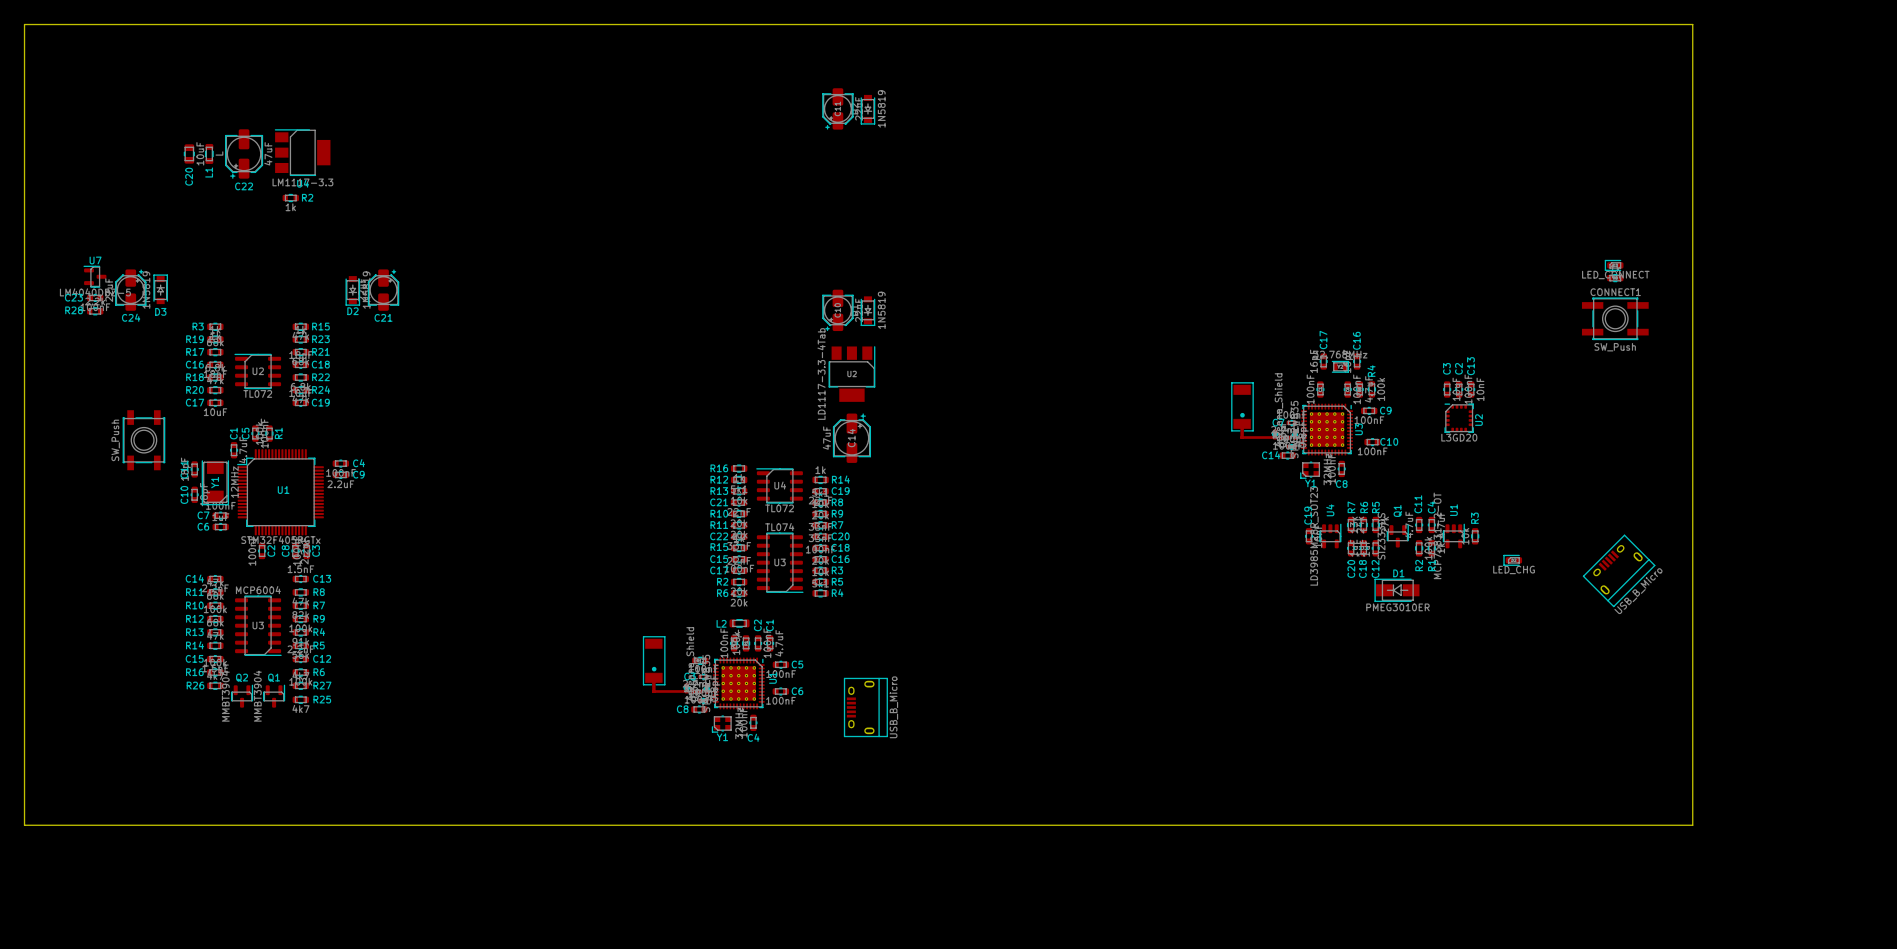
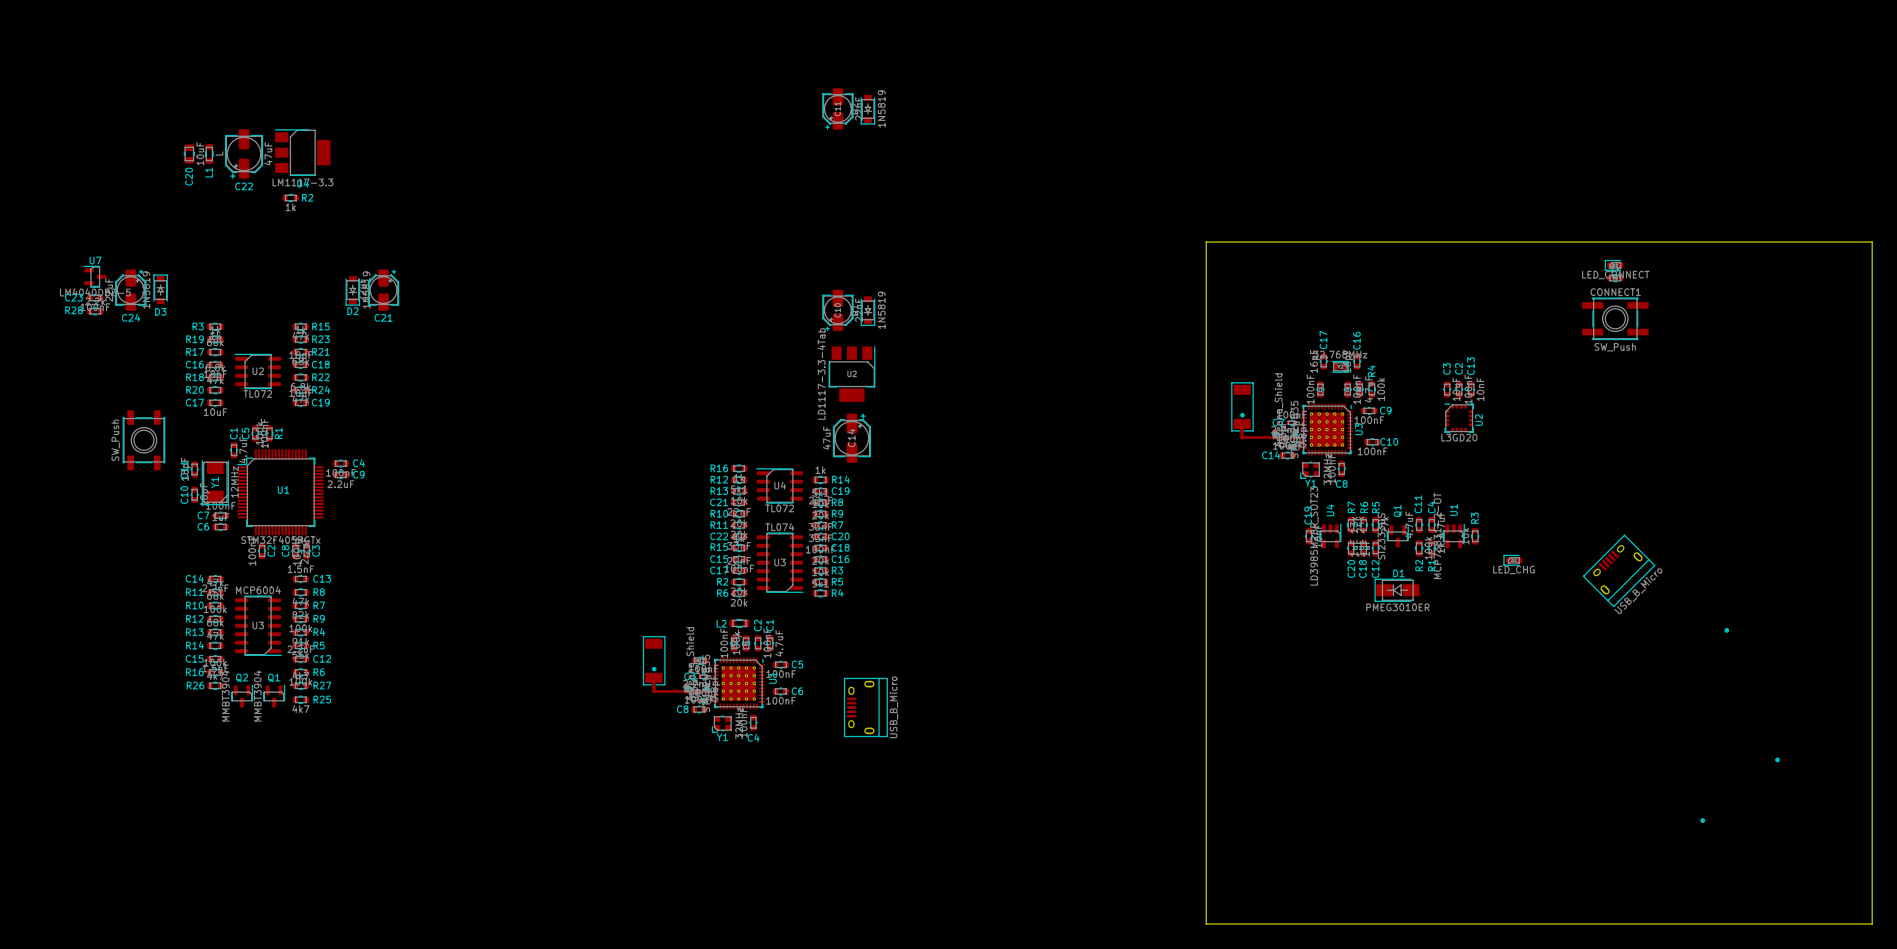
board edge: (24, 24) (1692, 24) (1692, 825) (24, 825) (24, 24) -> none
board edge: none -> (1206, 242) (1872, 242) (1872, 924) (1206, 924) (1206, 242)
drawing: none -> [1724, 628, 1730, 633]
drawing: none -> [1775, 757, 1780, 763]
drawing: none -> [1700, 818, 1706, 823]

